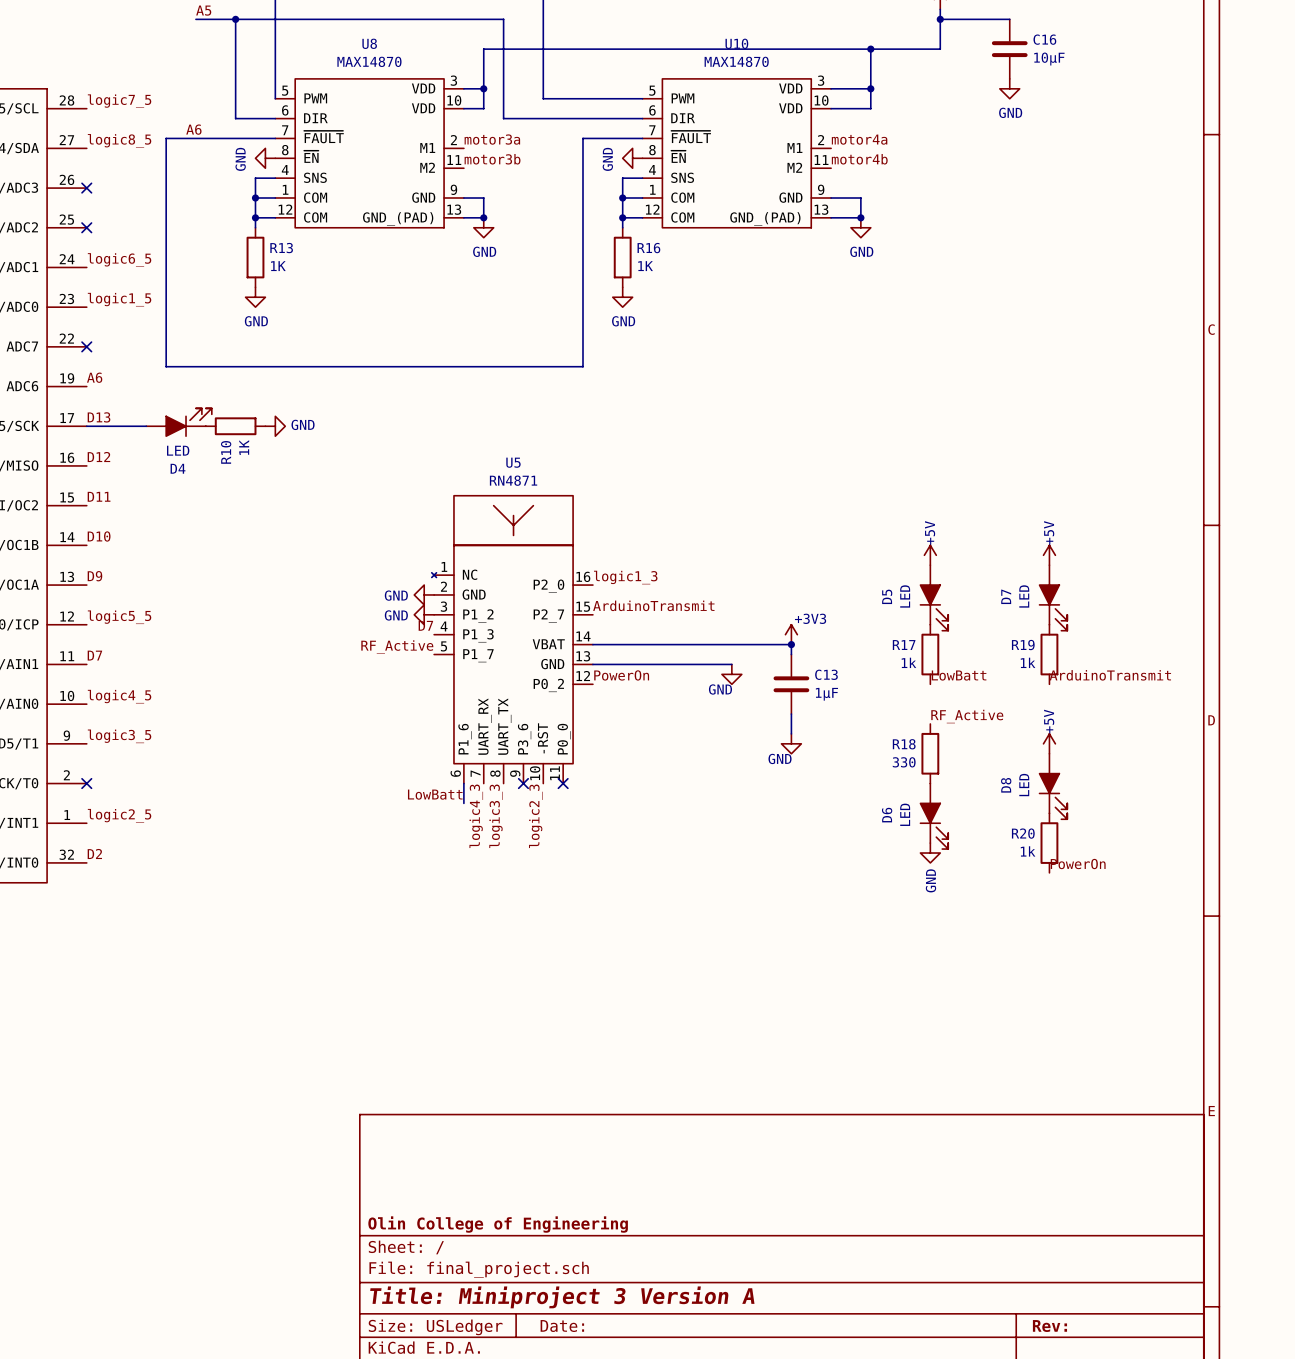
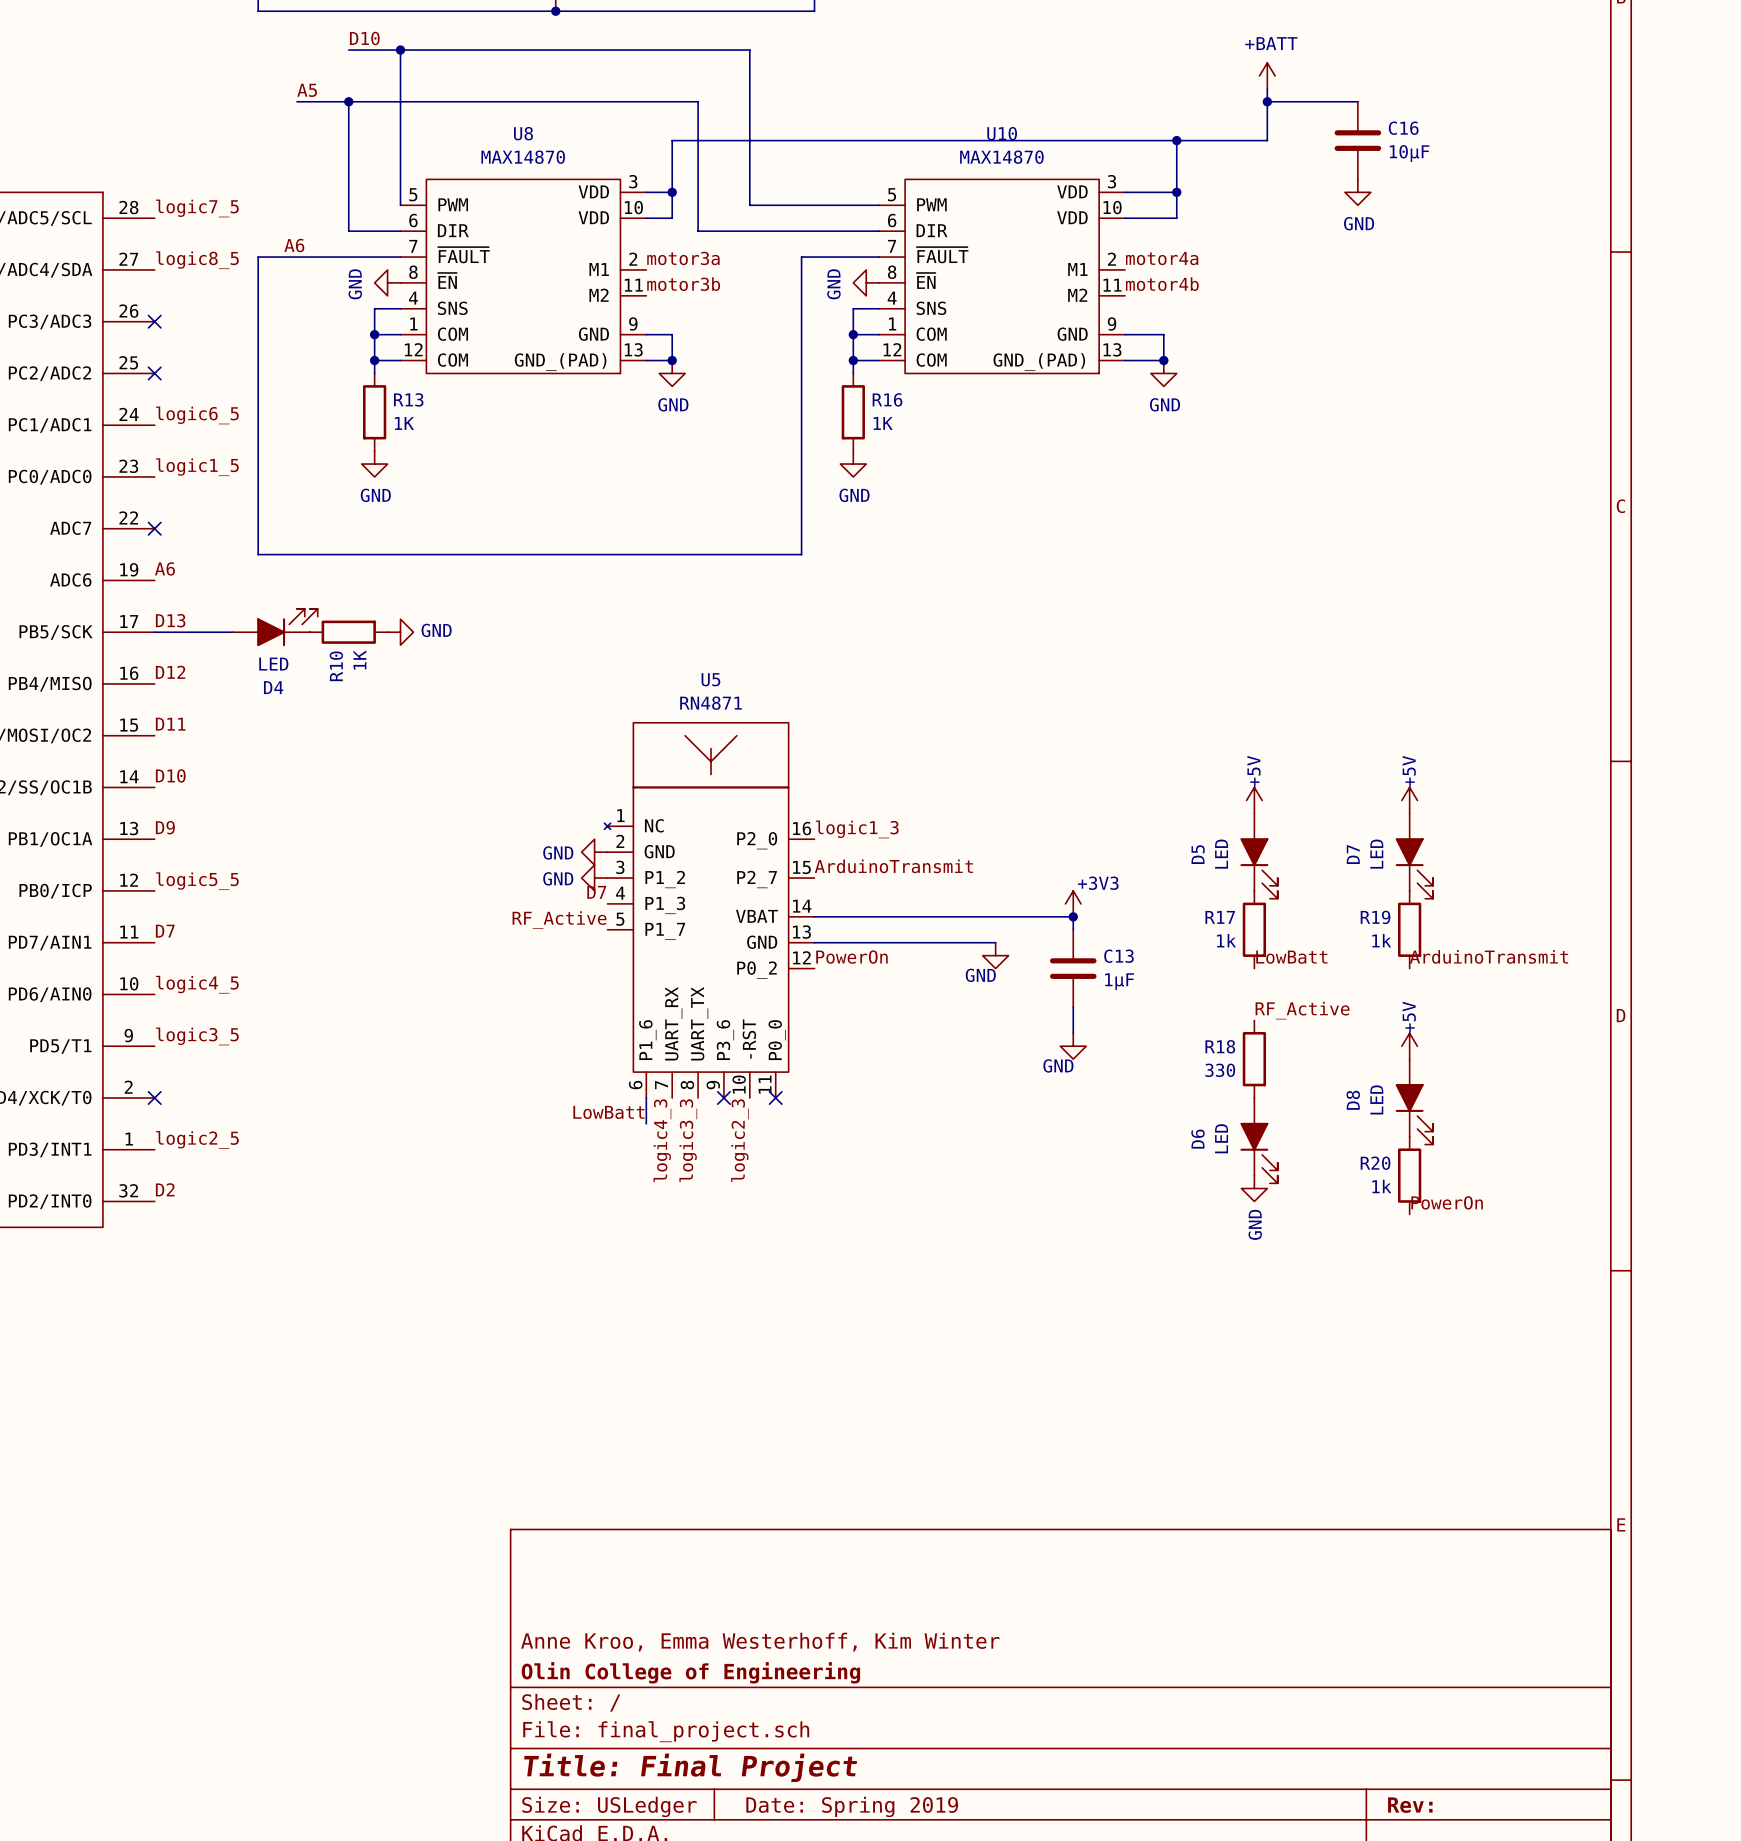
title block: none -> Anne Kroo, Emma Westerhoff, Kim Winter (760, 1642)
title block: Title: Miniproject 3 Version A (562, 1297) -> Title: Final Project (690, 1767)
title block: Date: (562, 1326) -> Date: Spring 2019 (852, 1806)

